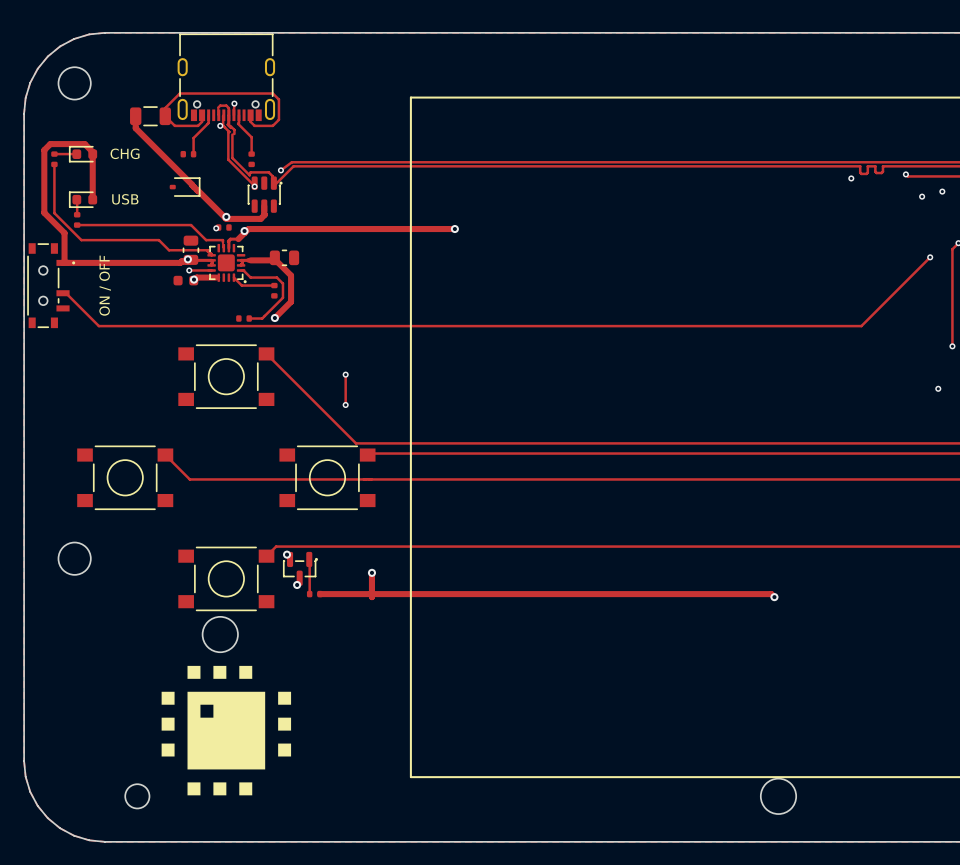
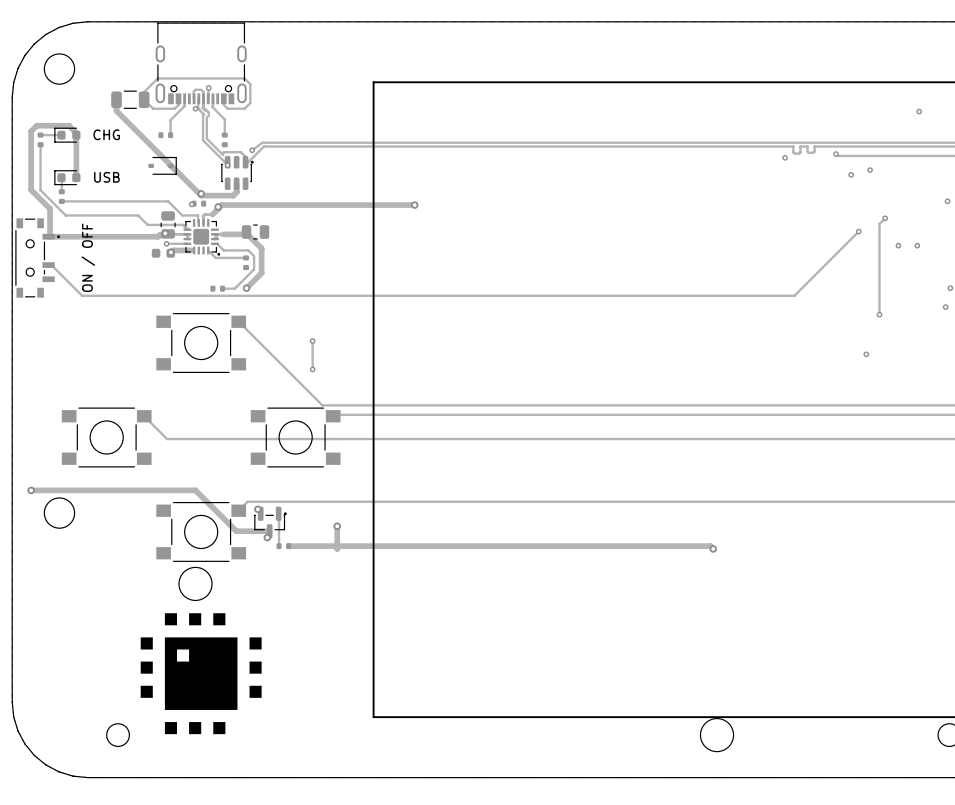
track: none -> (31, 490) (195, 490) (236, 531) (269, 531)
via: none -> (31, 490)

